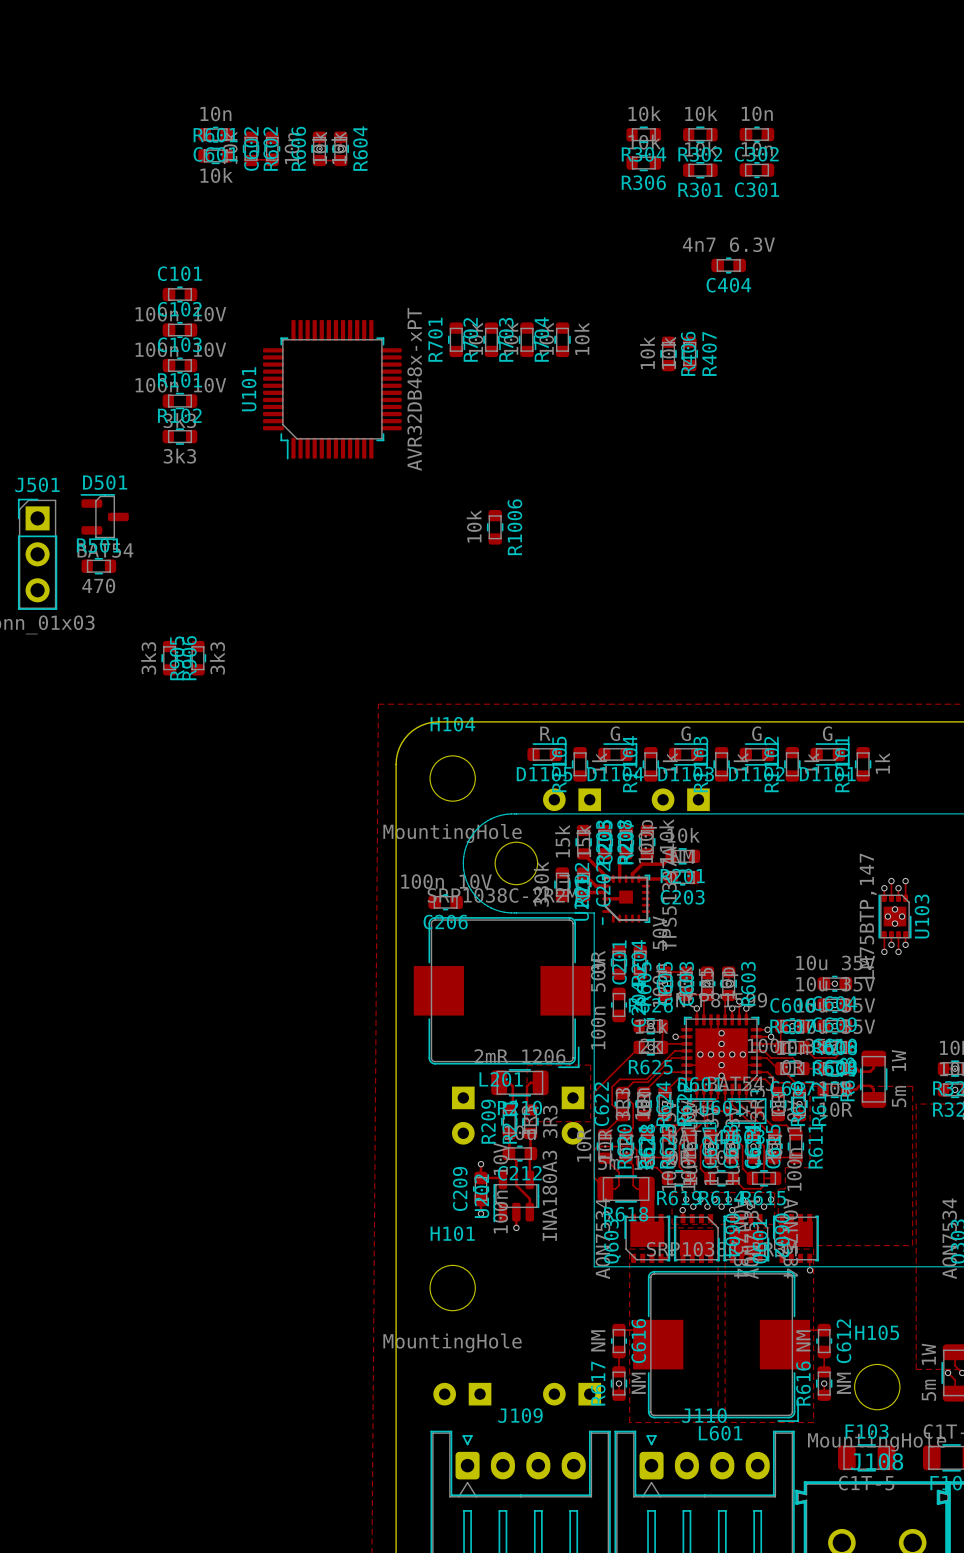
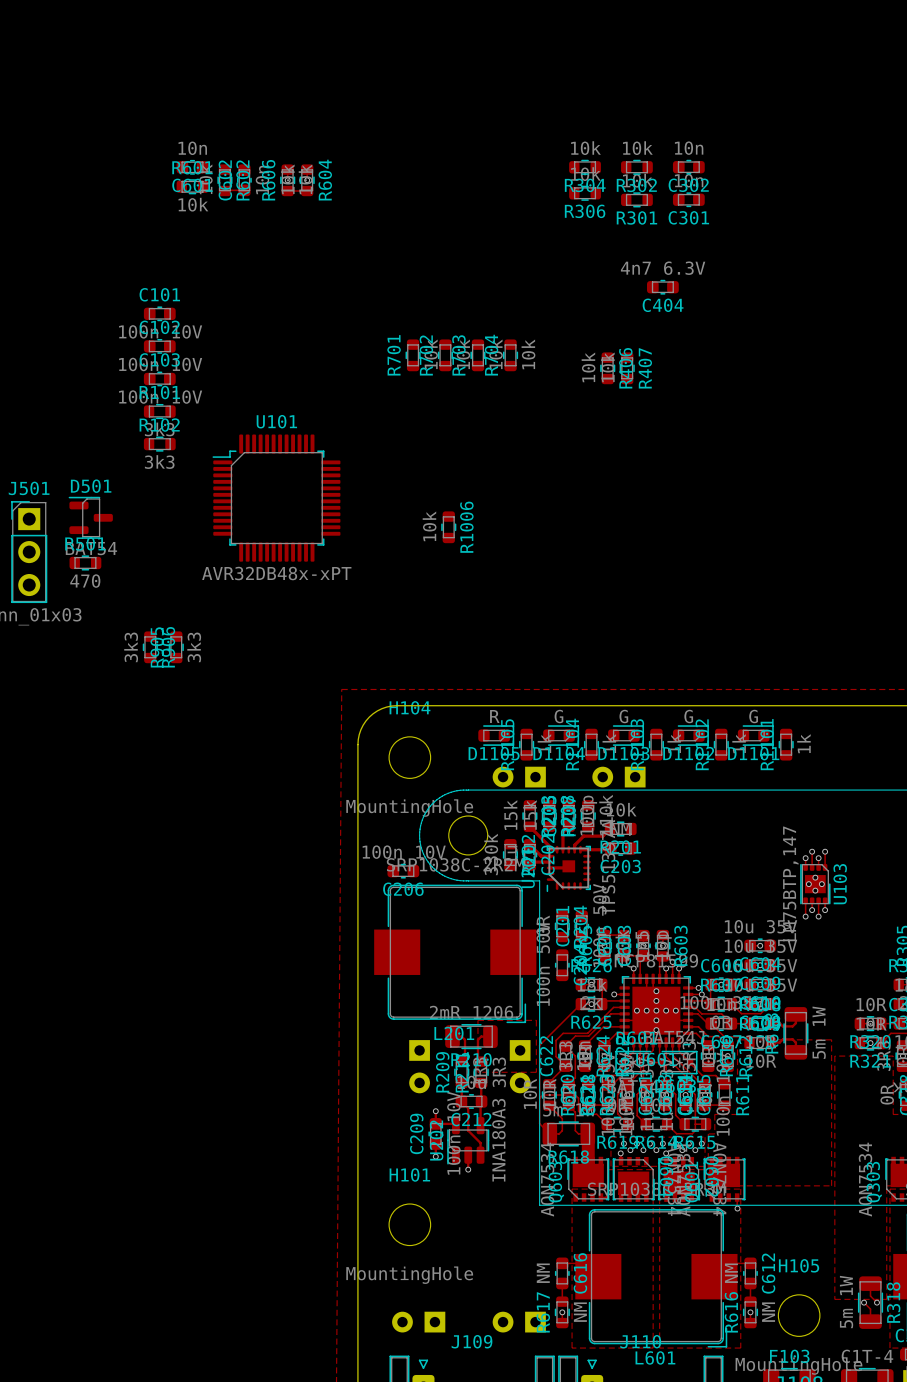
U101 rotation: 0° (332, 389) -> 90° clockwise (276, 498)
U101 position: (332, 389) -> (276, 498)

